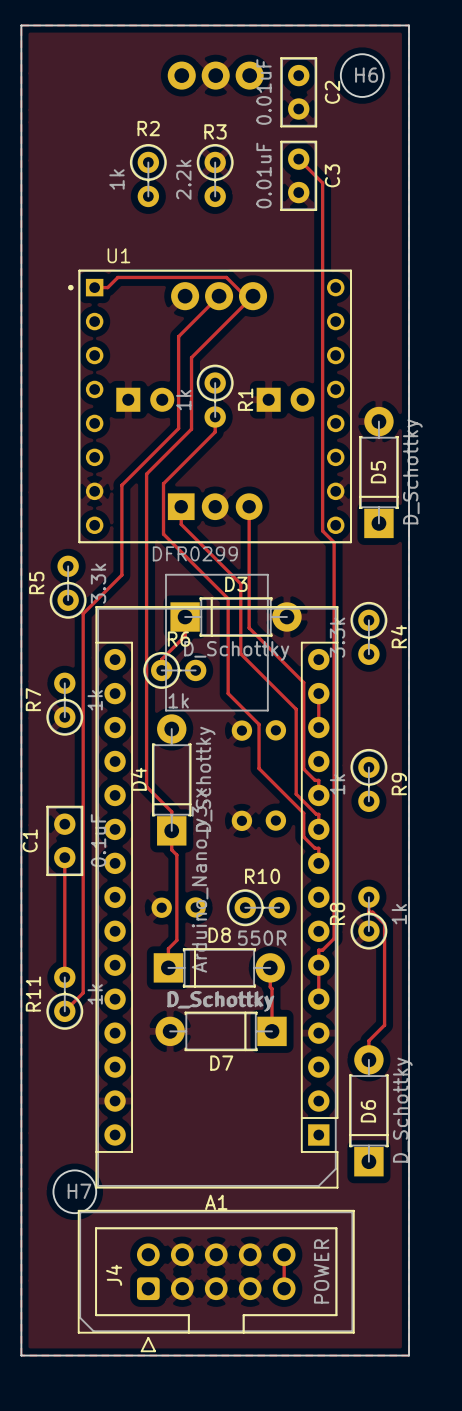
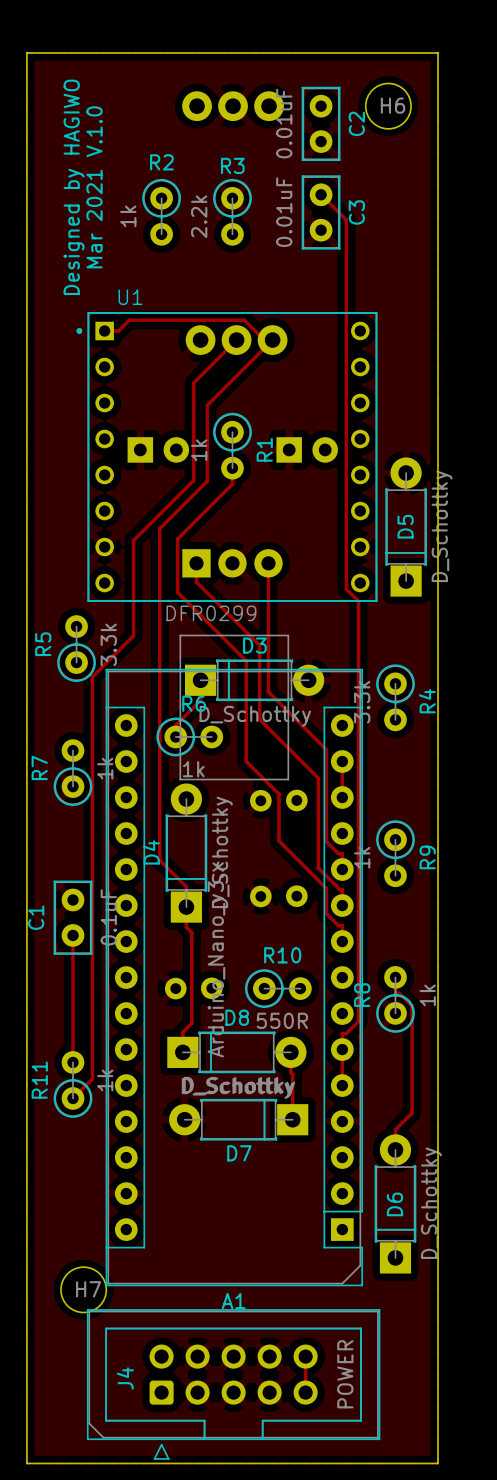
text: none -> Designed by HAGIWO (74, 187)
text: none -> Mar 2021 V.1.0 (94, 187)

